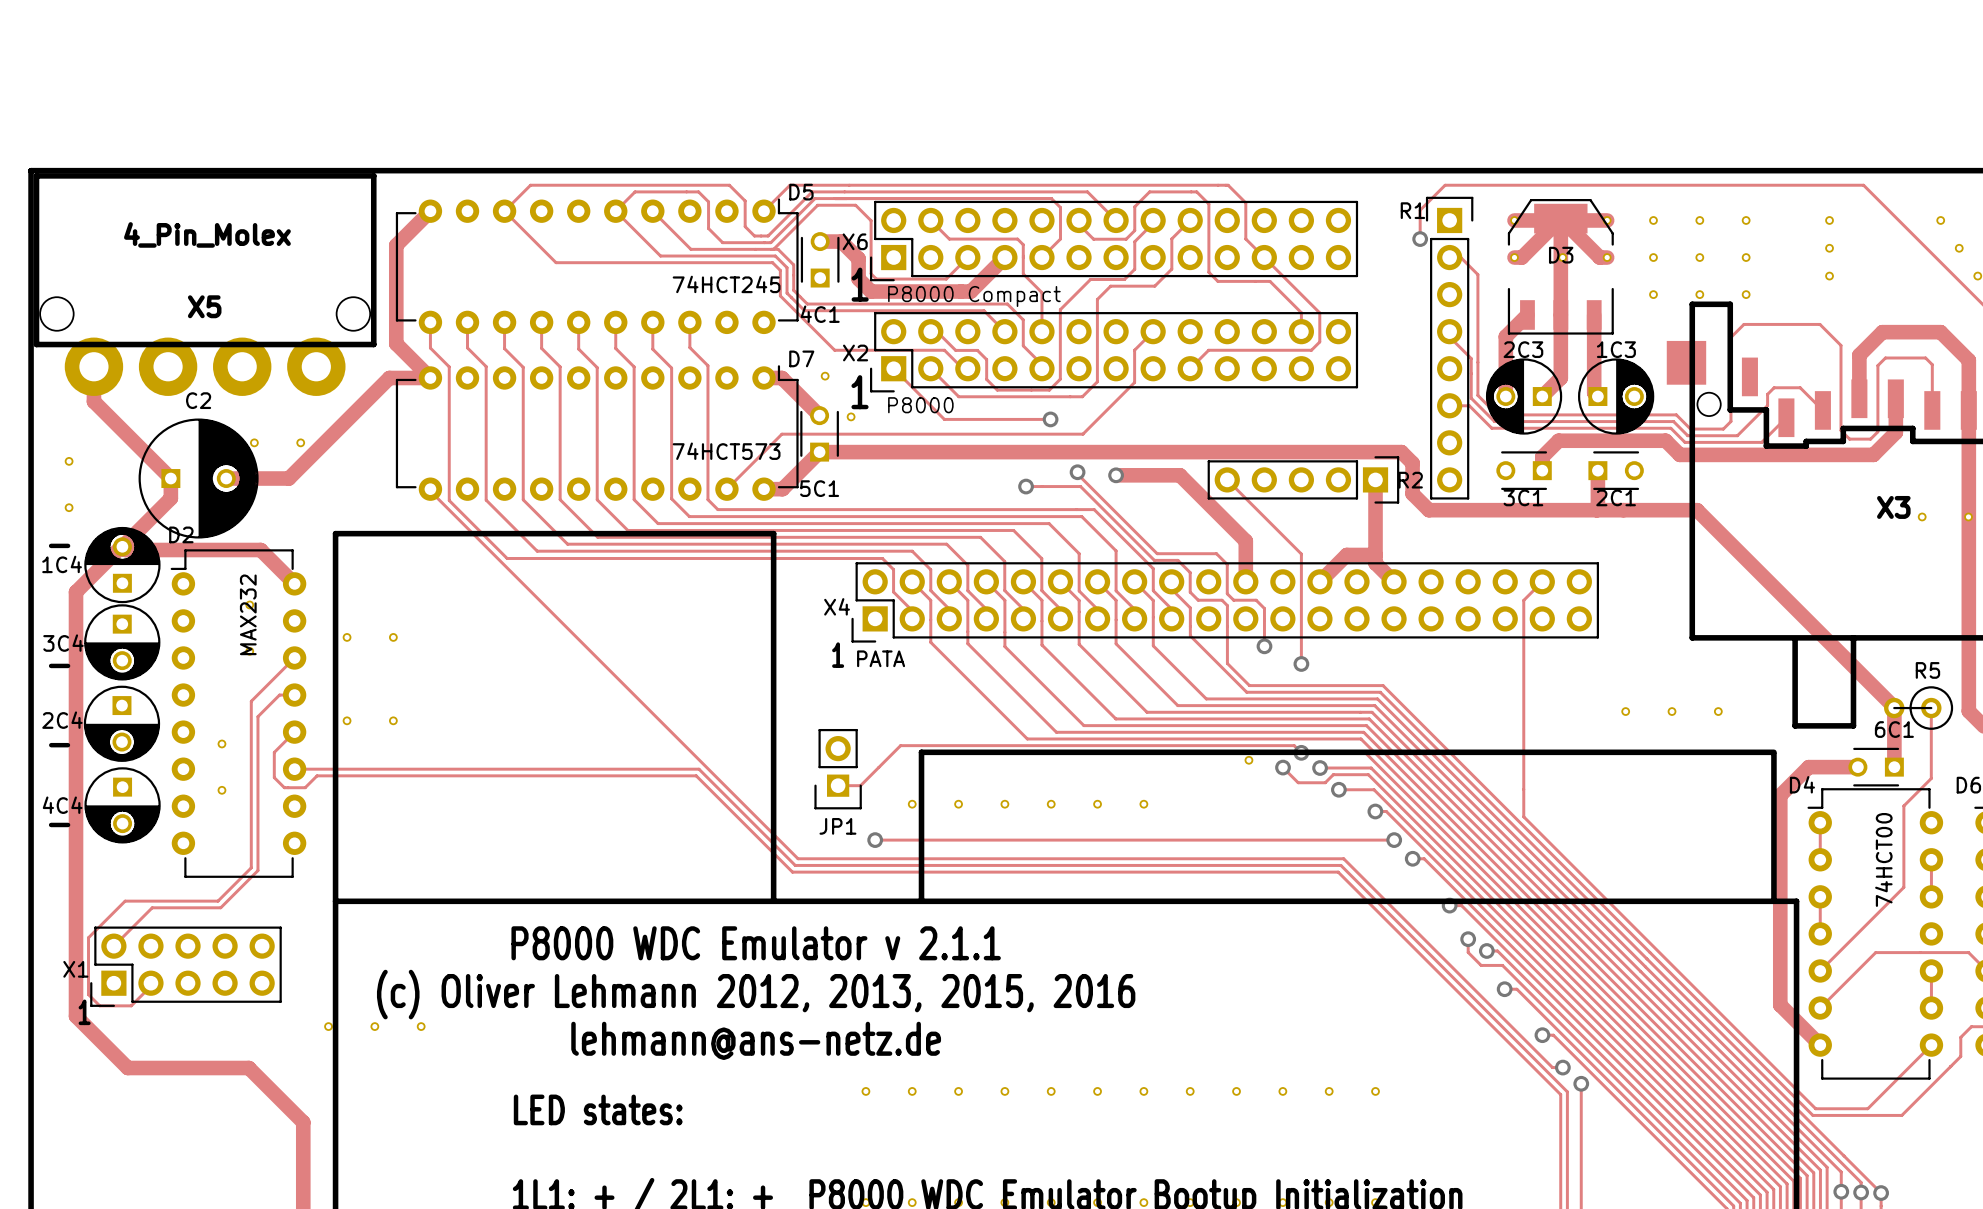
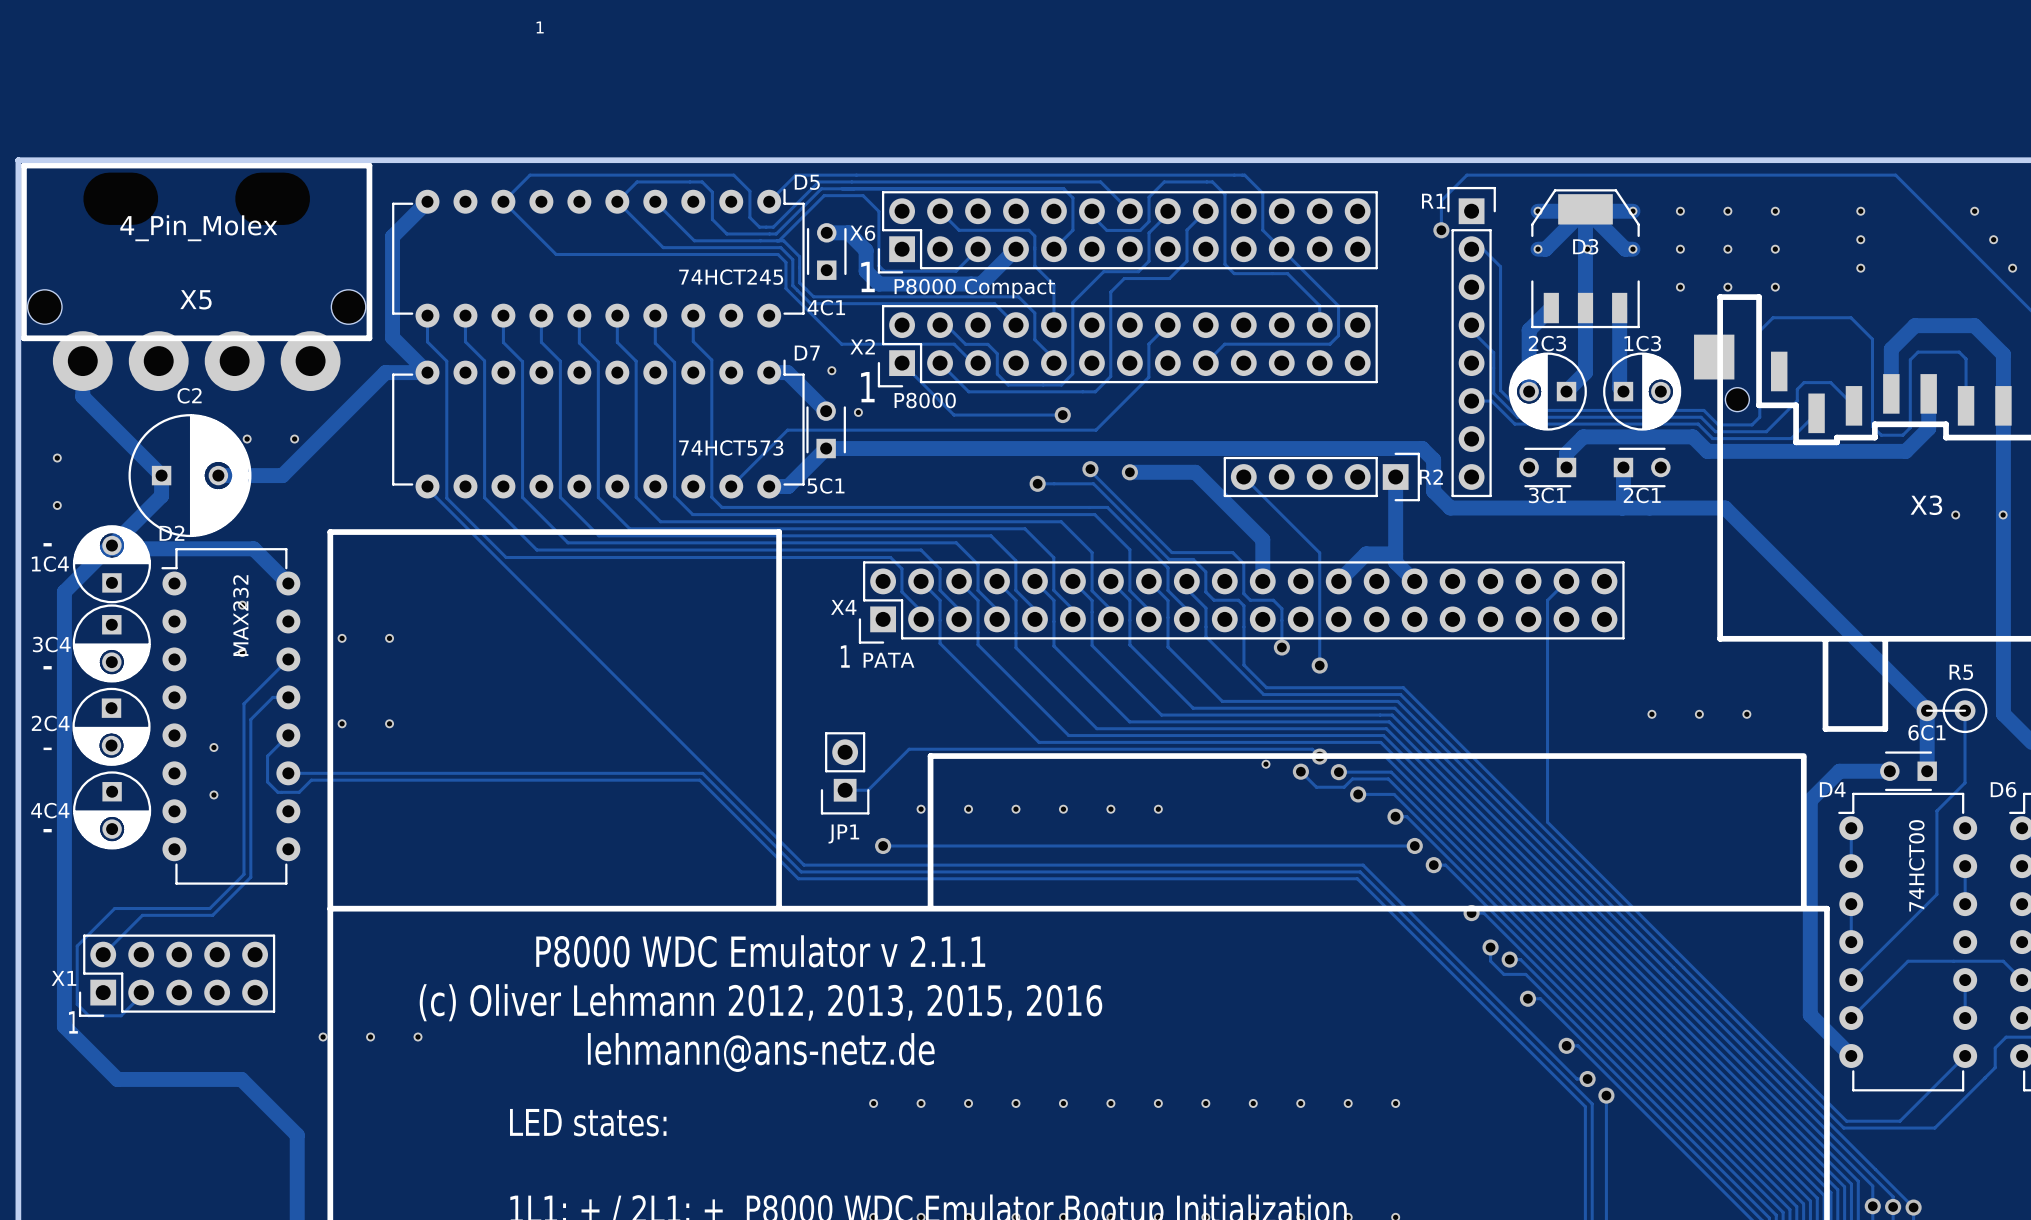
text: none -> 1 (540, 27)

